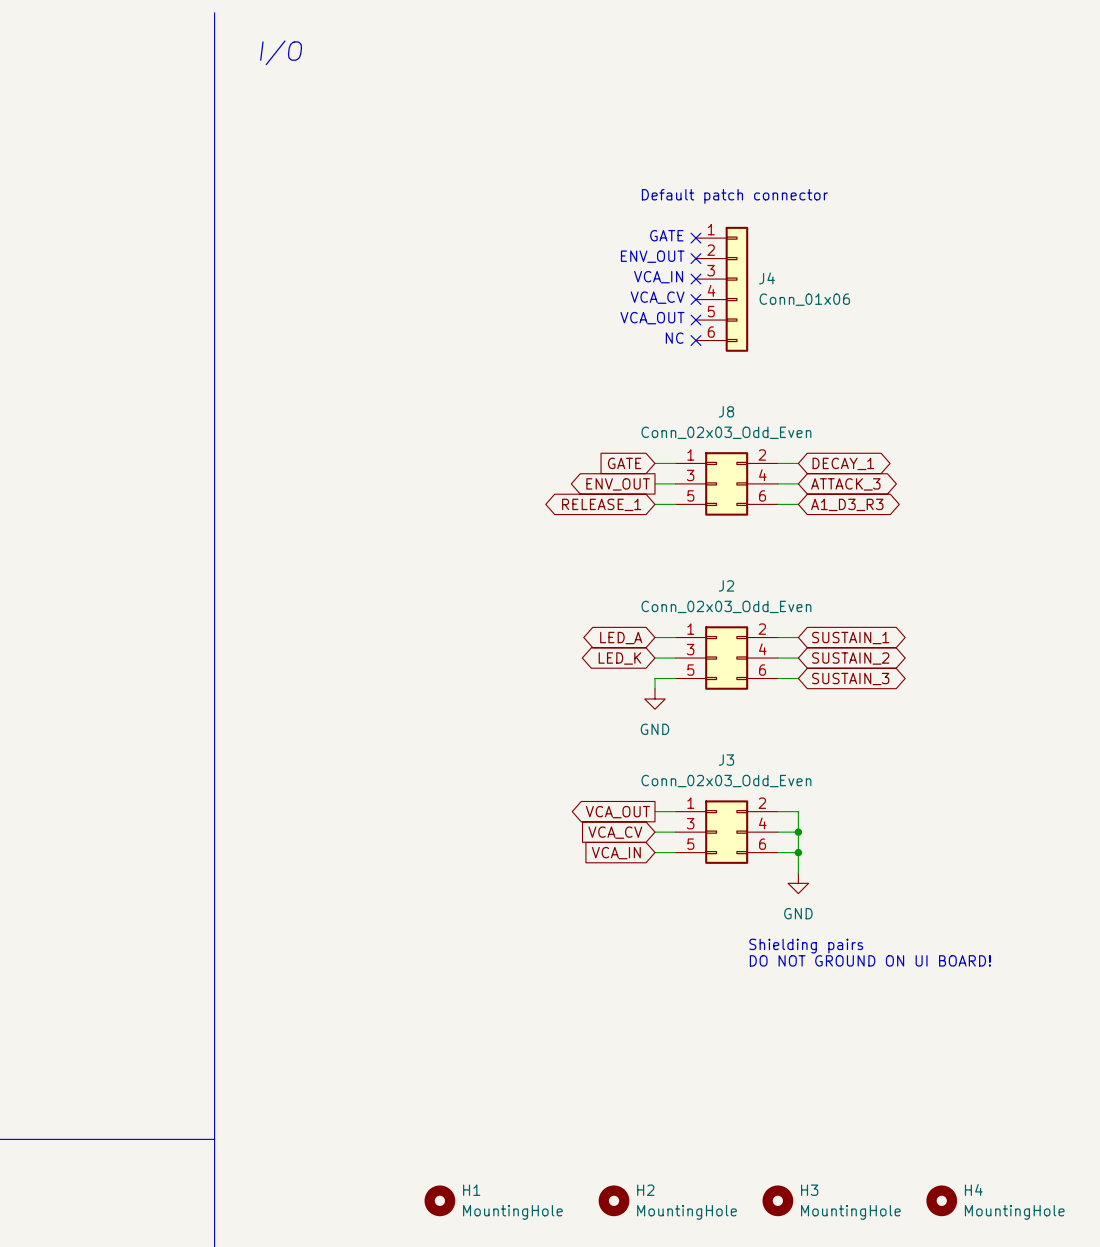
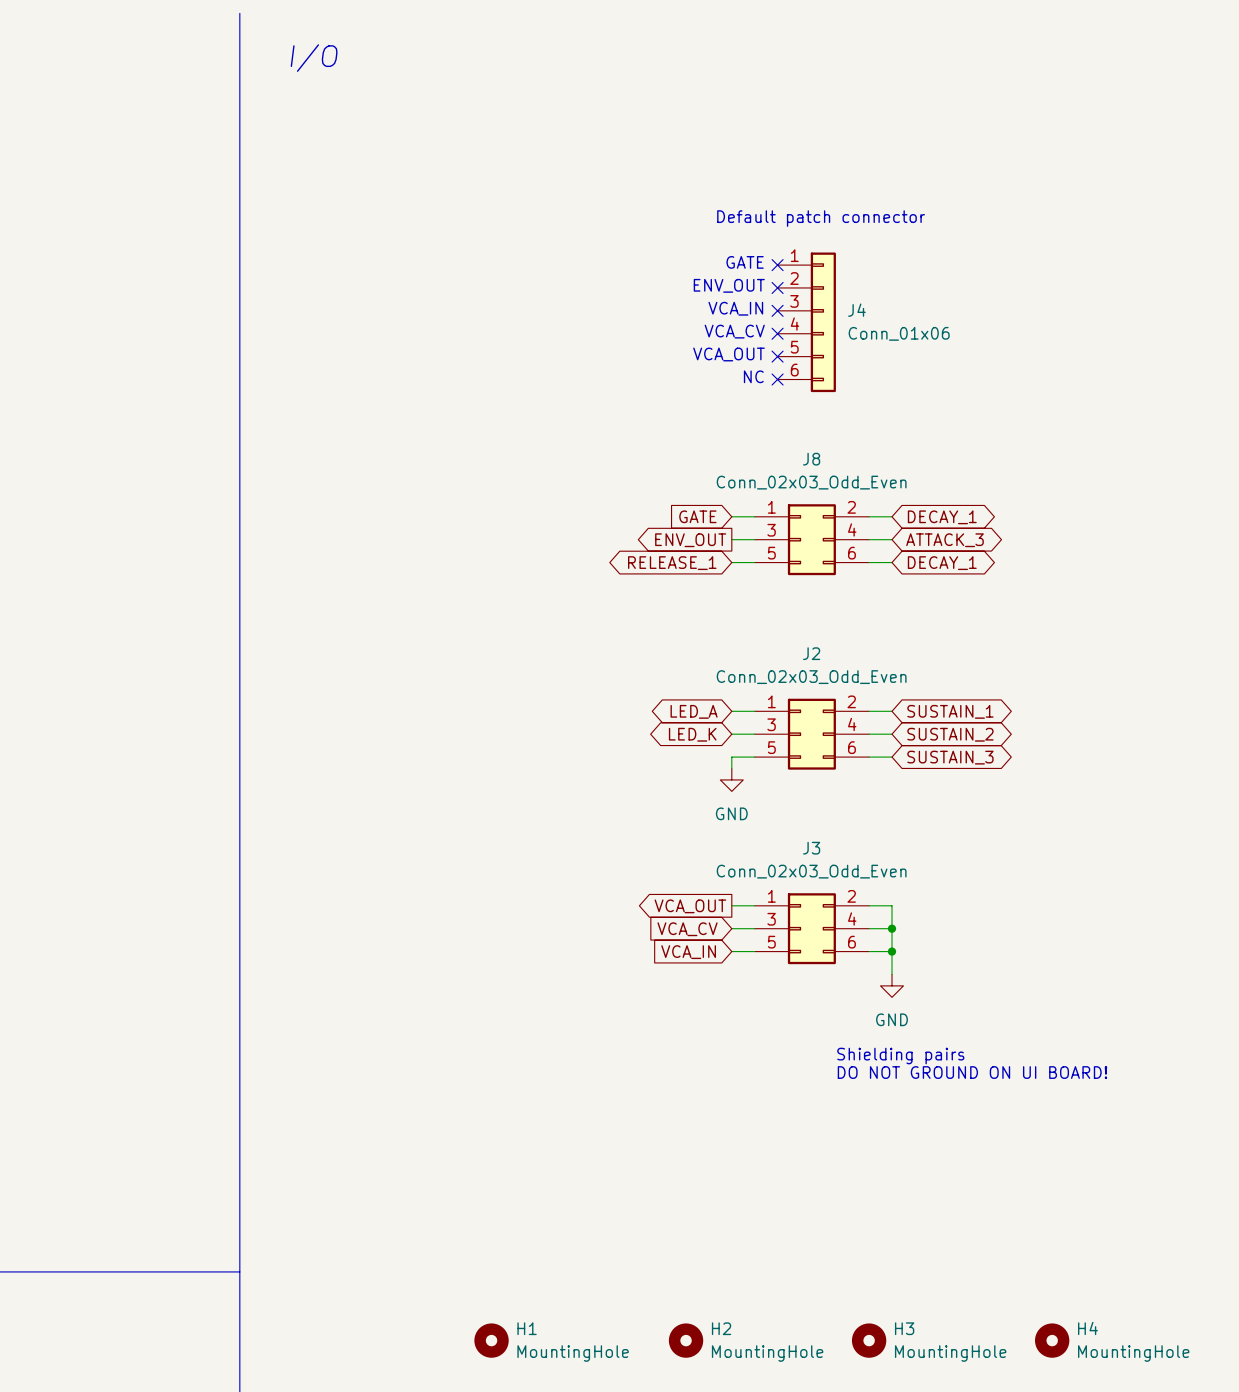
global label: A1_D3_R3 (847, 504) -> DECAY_1 (942, 563)

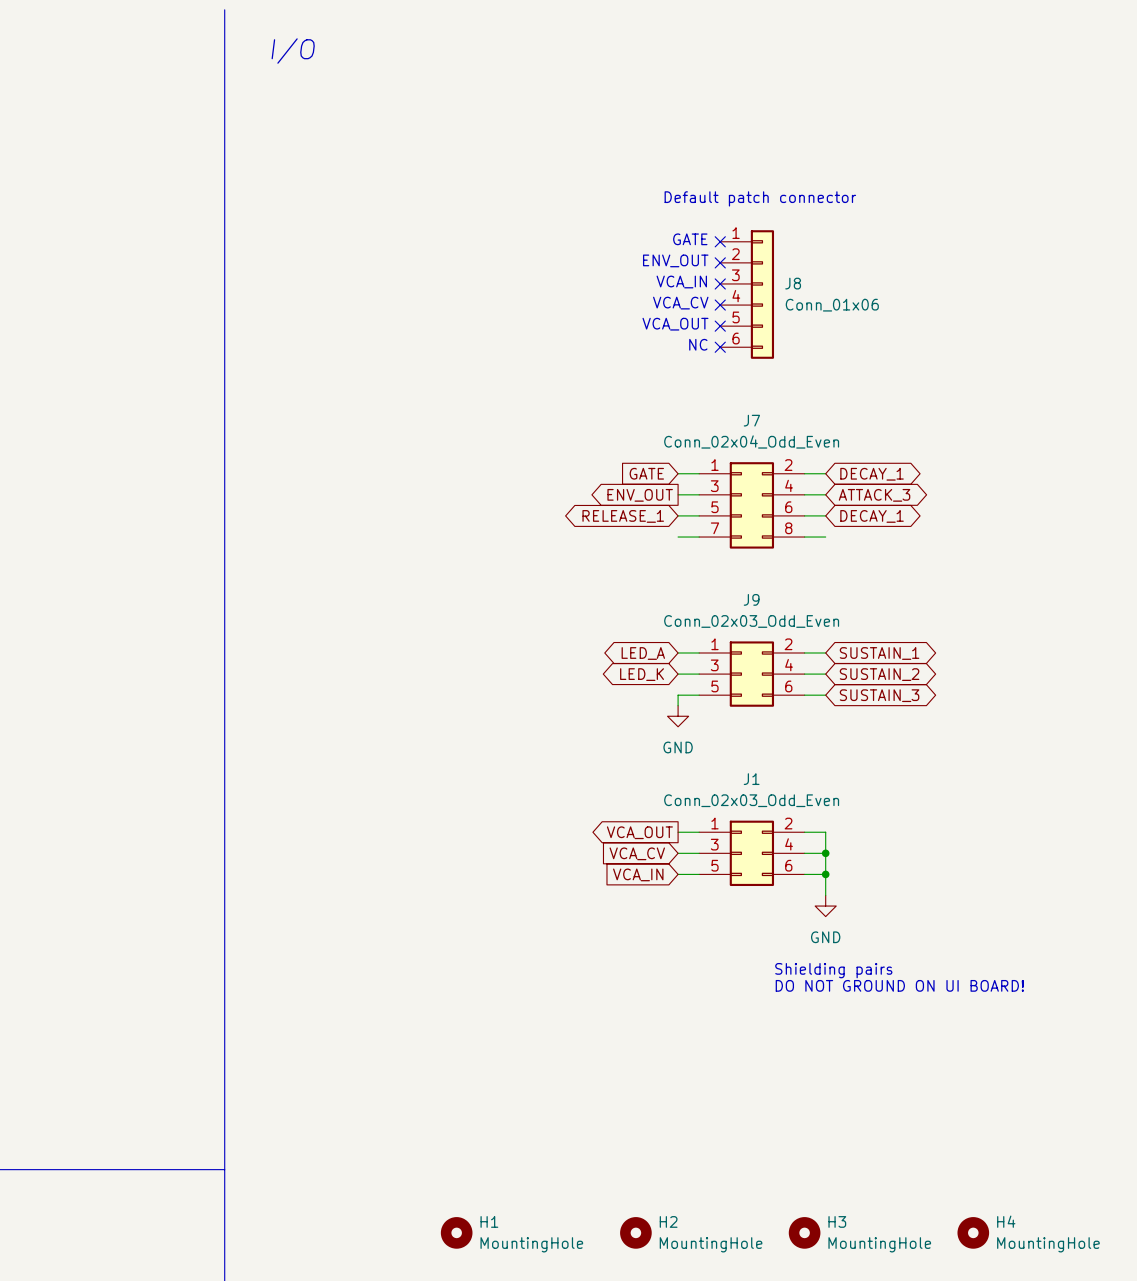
J4 name: J4 (856, 310) -> J8 (793, 283)
J8: Conn_02x03_Odd_Even (811, 539) -> none
J7: none -> Conn_02x04_Odd_Even (751, 505)
wire: none -> (678, 537) (699, 537)
wire: none -> (804, 537) (825, 537)
J2 name: J2 (811, 653) -> J9 (751, 599)
J3 name: J3 (811, 848) -> J1 (751, 779)

